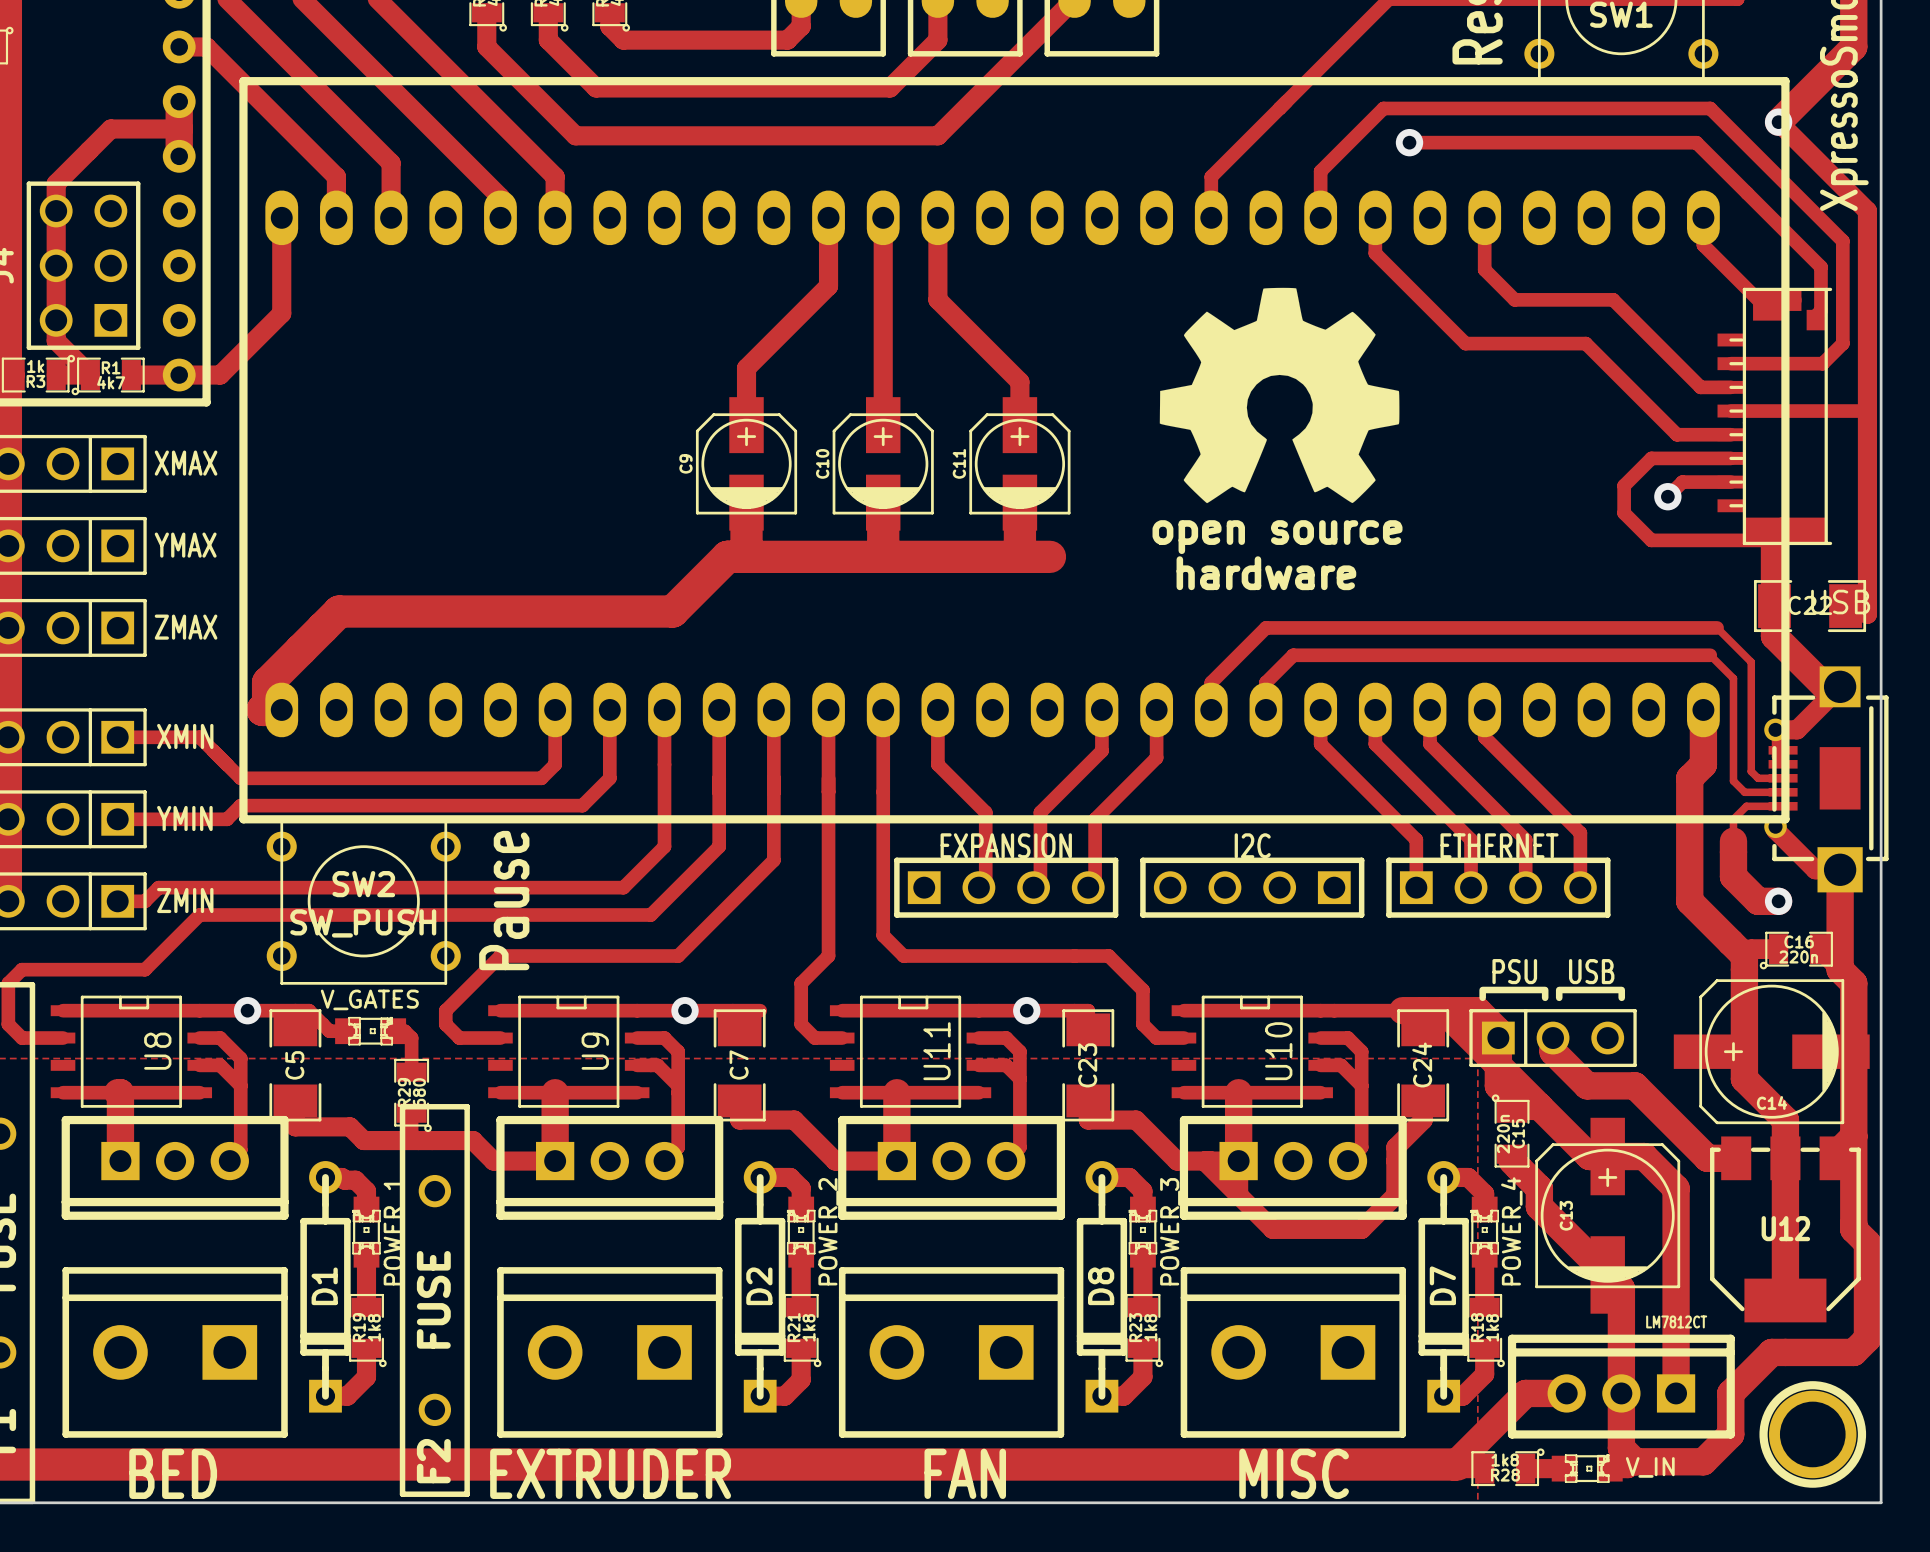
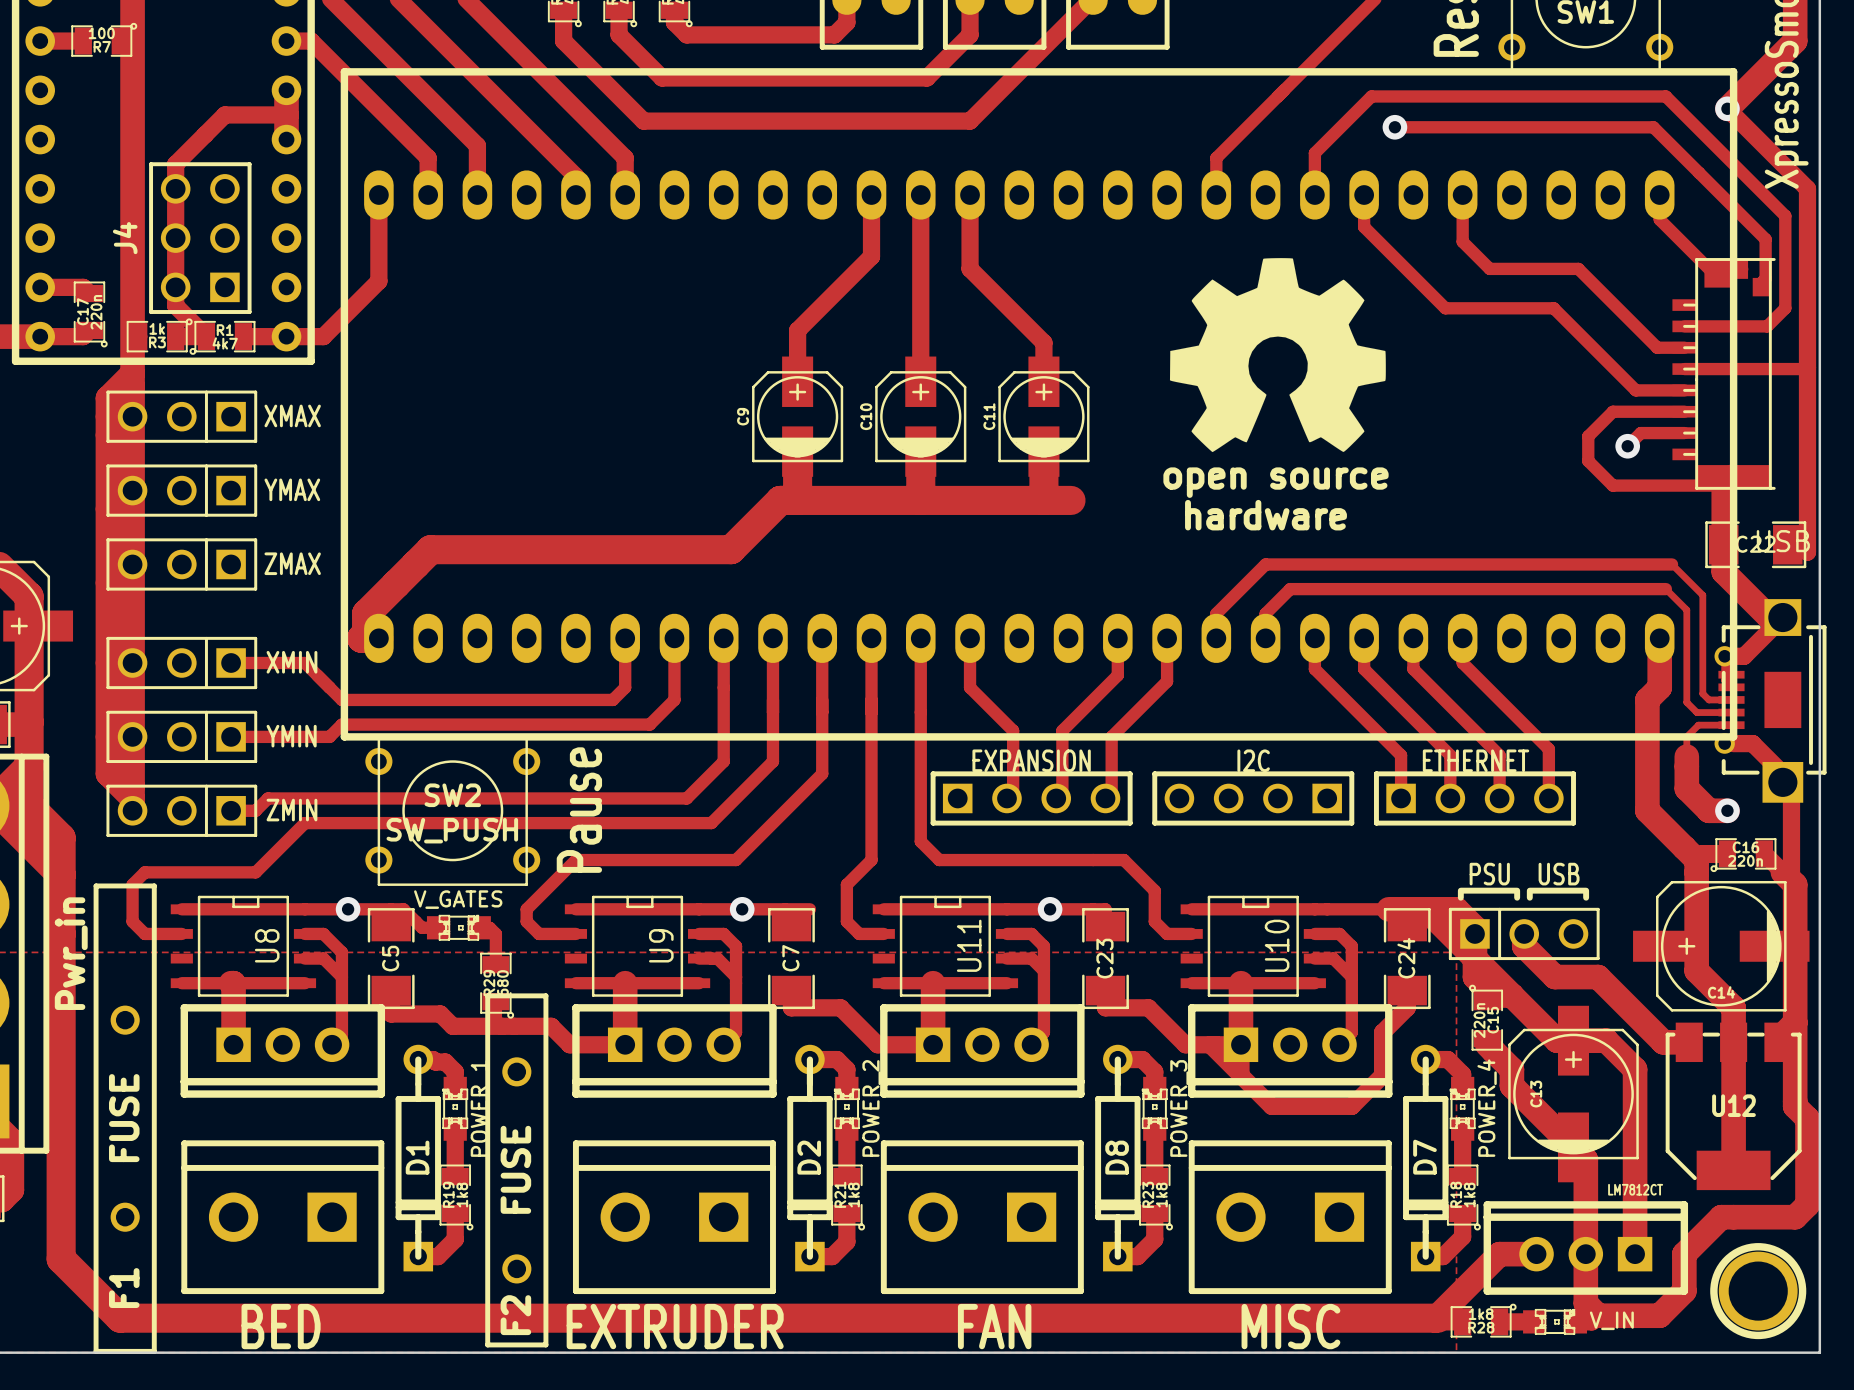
track: (1775, 826) (1775, 829) (1815, 869) (1840, 869) (1840, 969) -> none
track: none -> (1733, 743) (1752, 743) (1791, 782) (1791, 880) (1795, 884)

